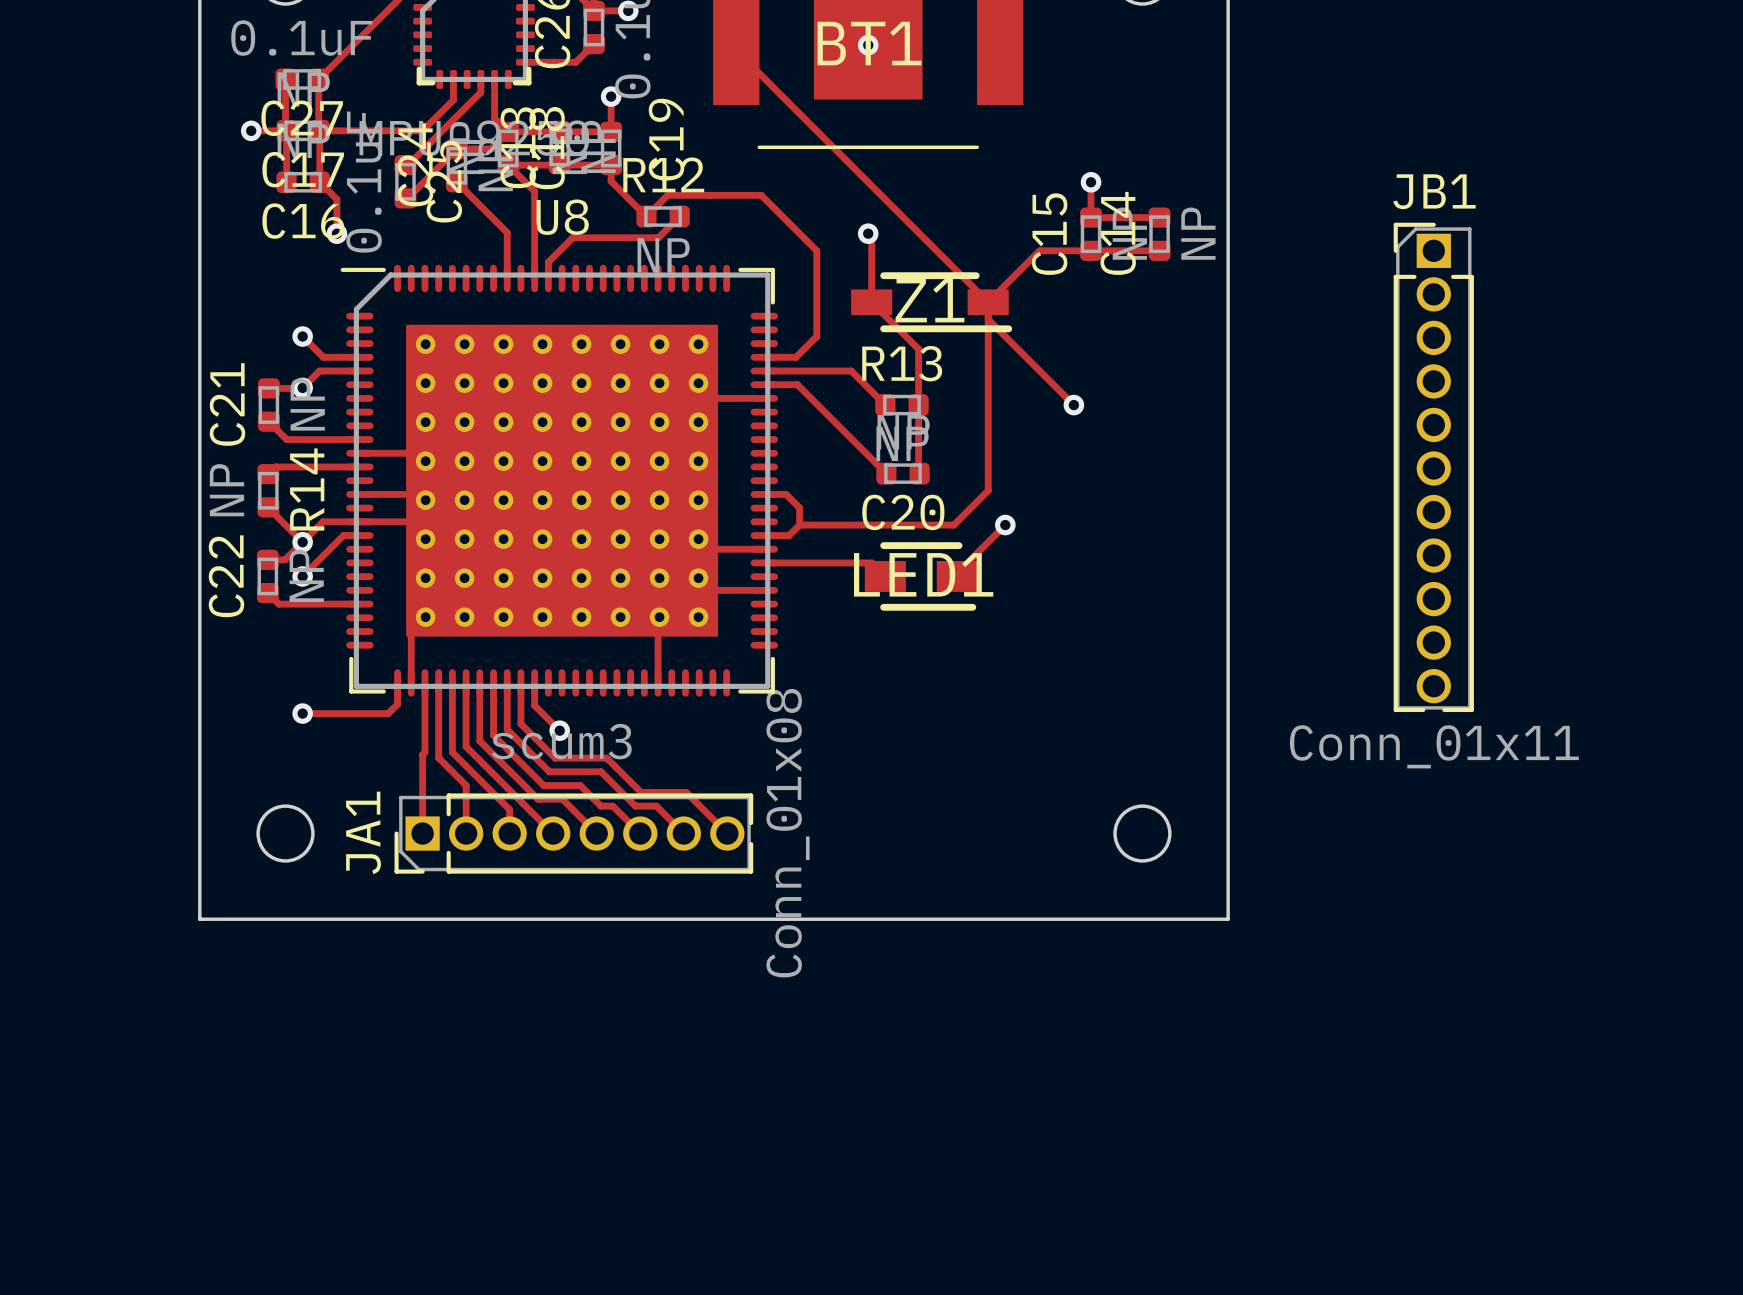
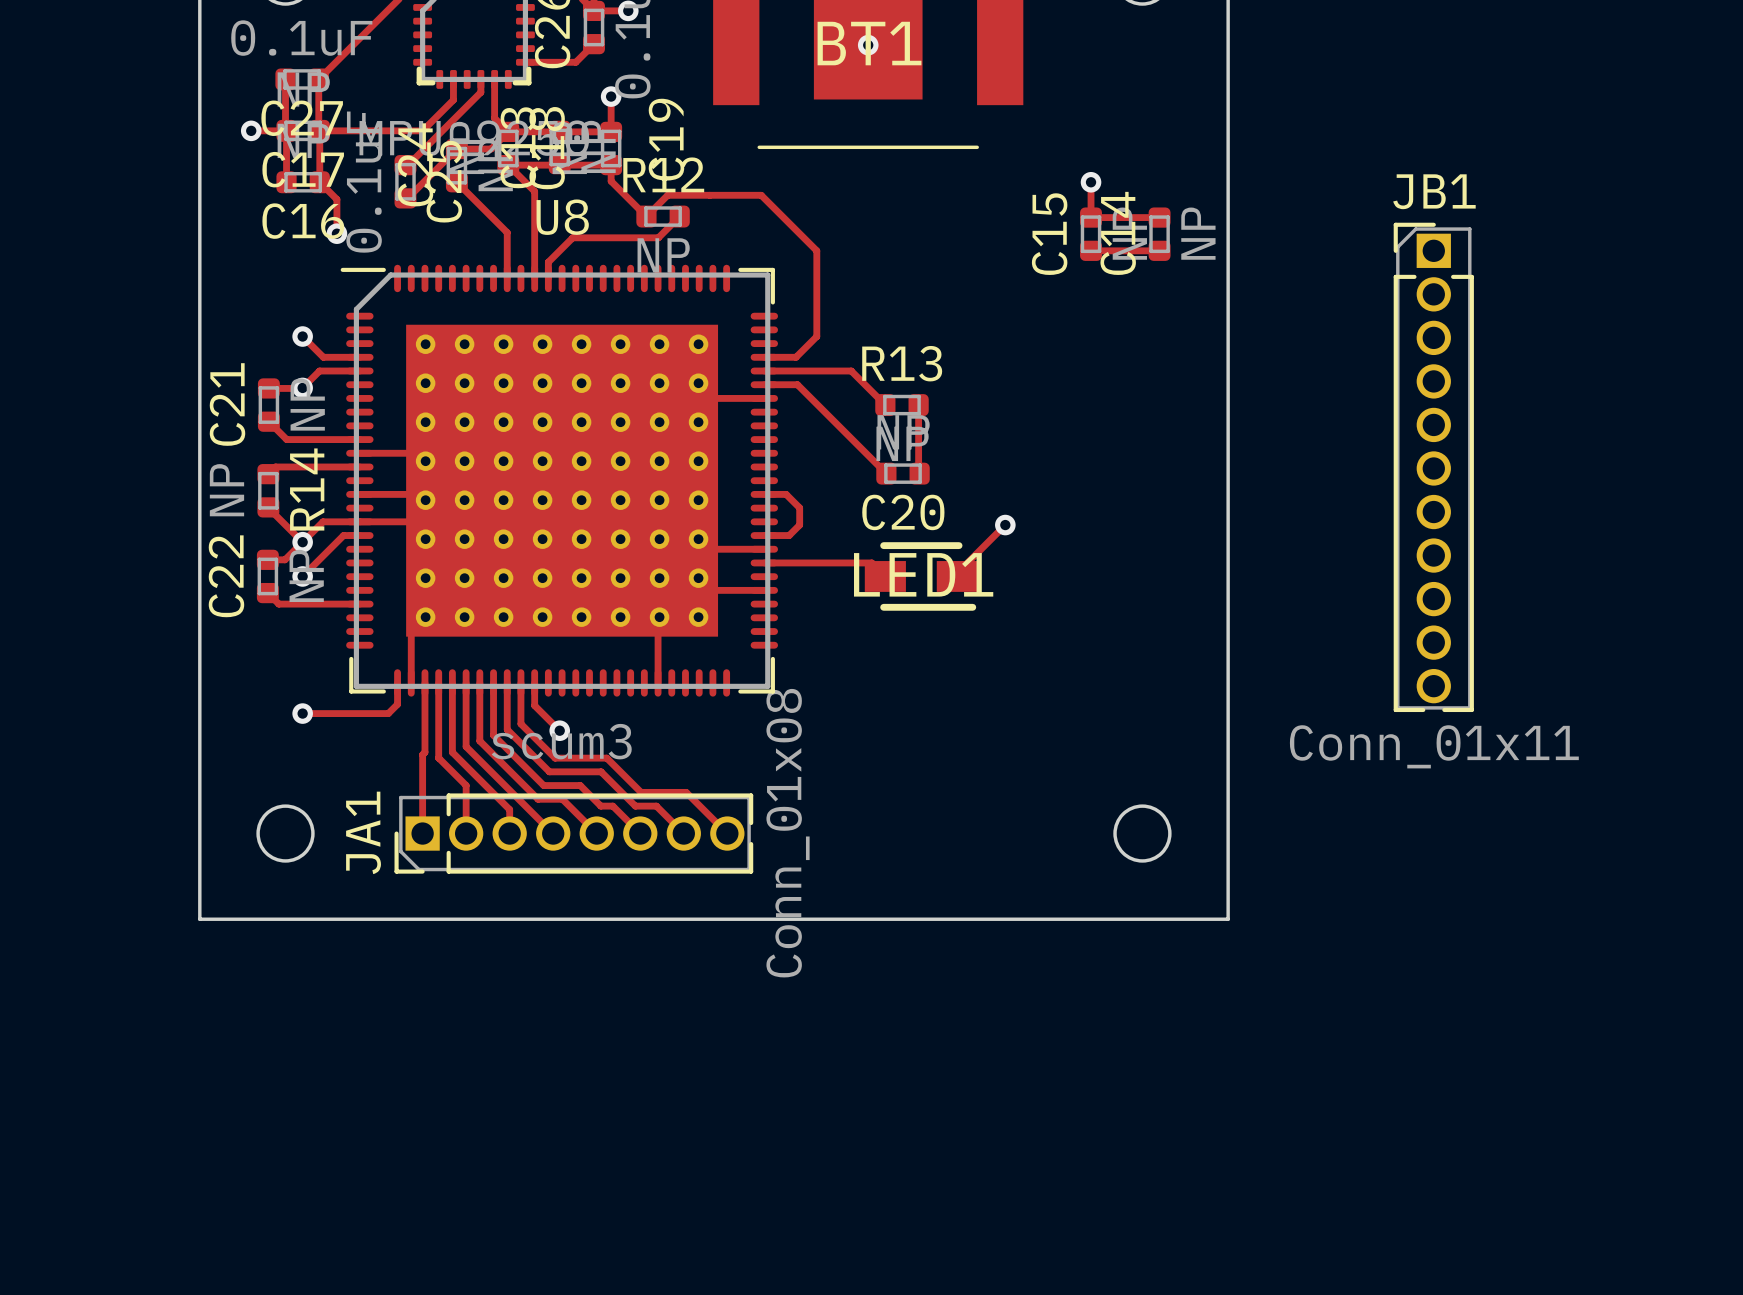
track: (736, 45) (736, 50) (988, 302) -> none
track: (868, 233) (871, 237) (871, 302) (918, 349) (918, 405) -> none
via: (868, 233) -> none
track: (1091, 250) (1039, 250) (988, 302) -> none
Z1: (931, 302) -> none
track: (988, 302) (988, 490) (953, 525) (799, 525) -> none
track: (988, 319) (1073, 405) -> none
via: (1073, 405) -> none

